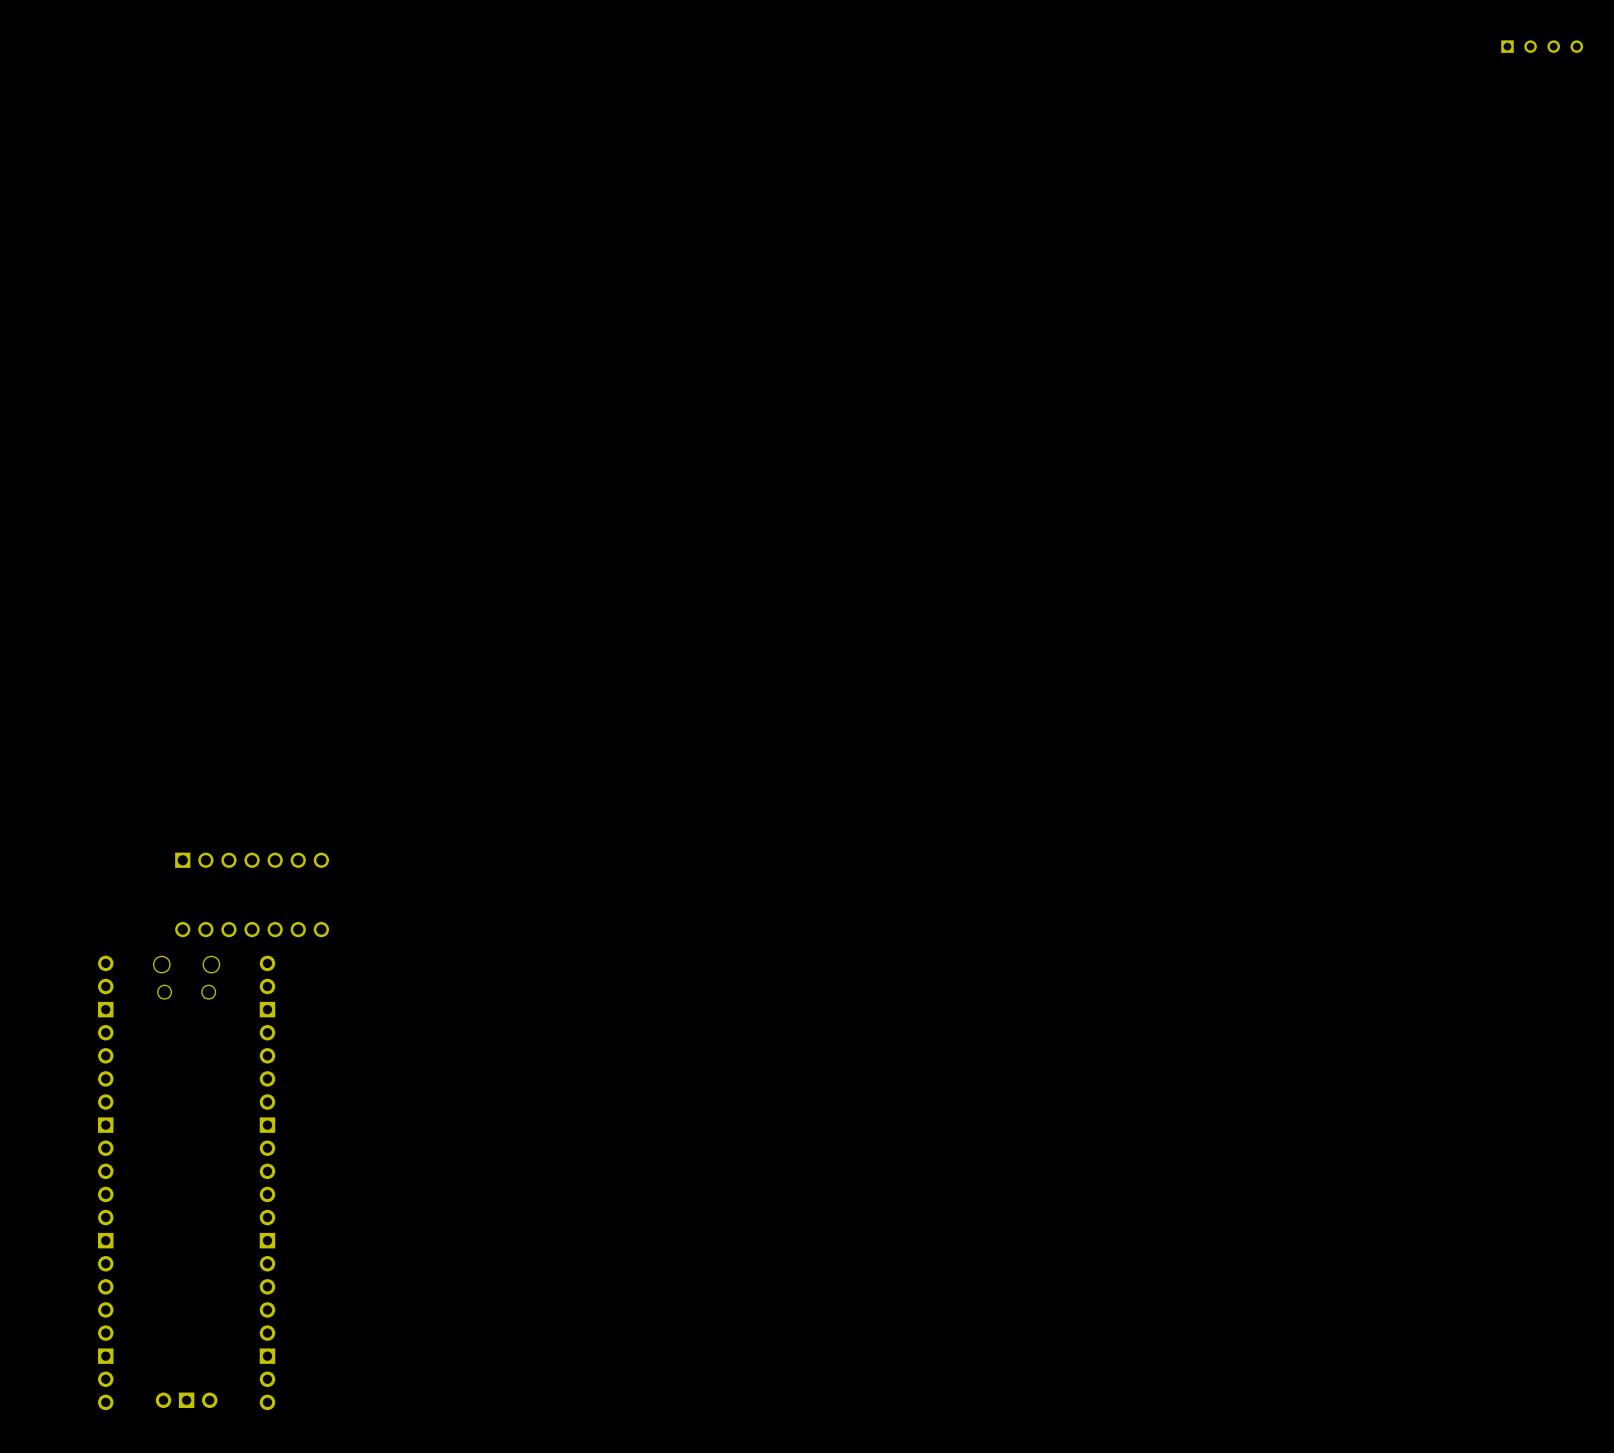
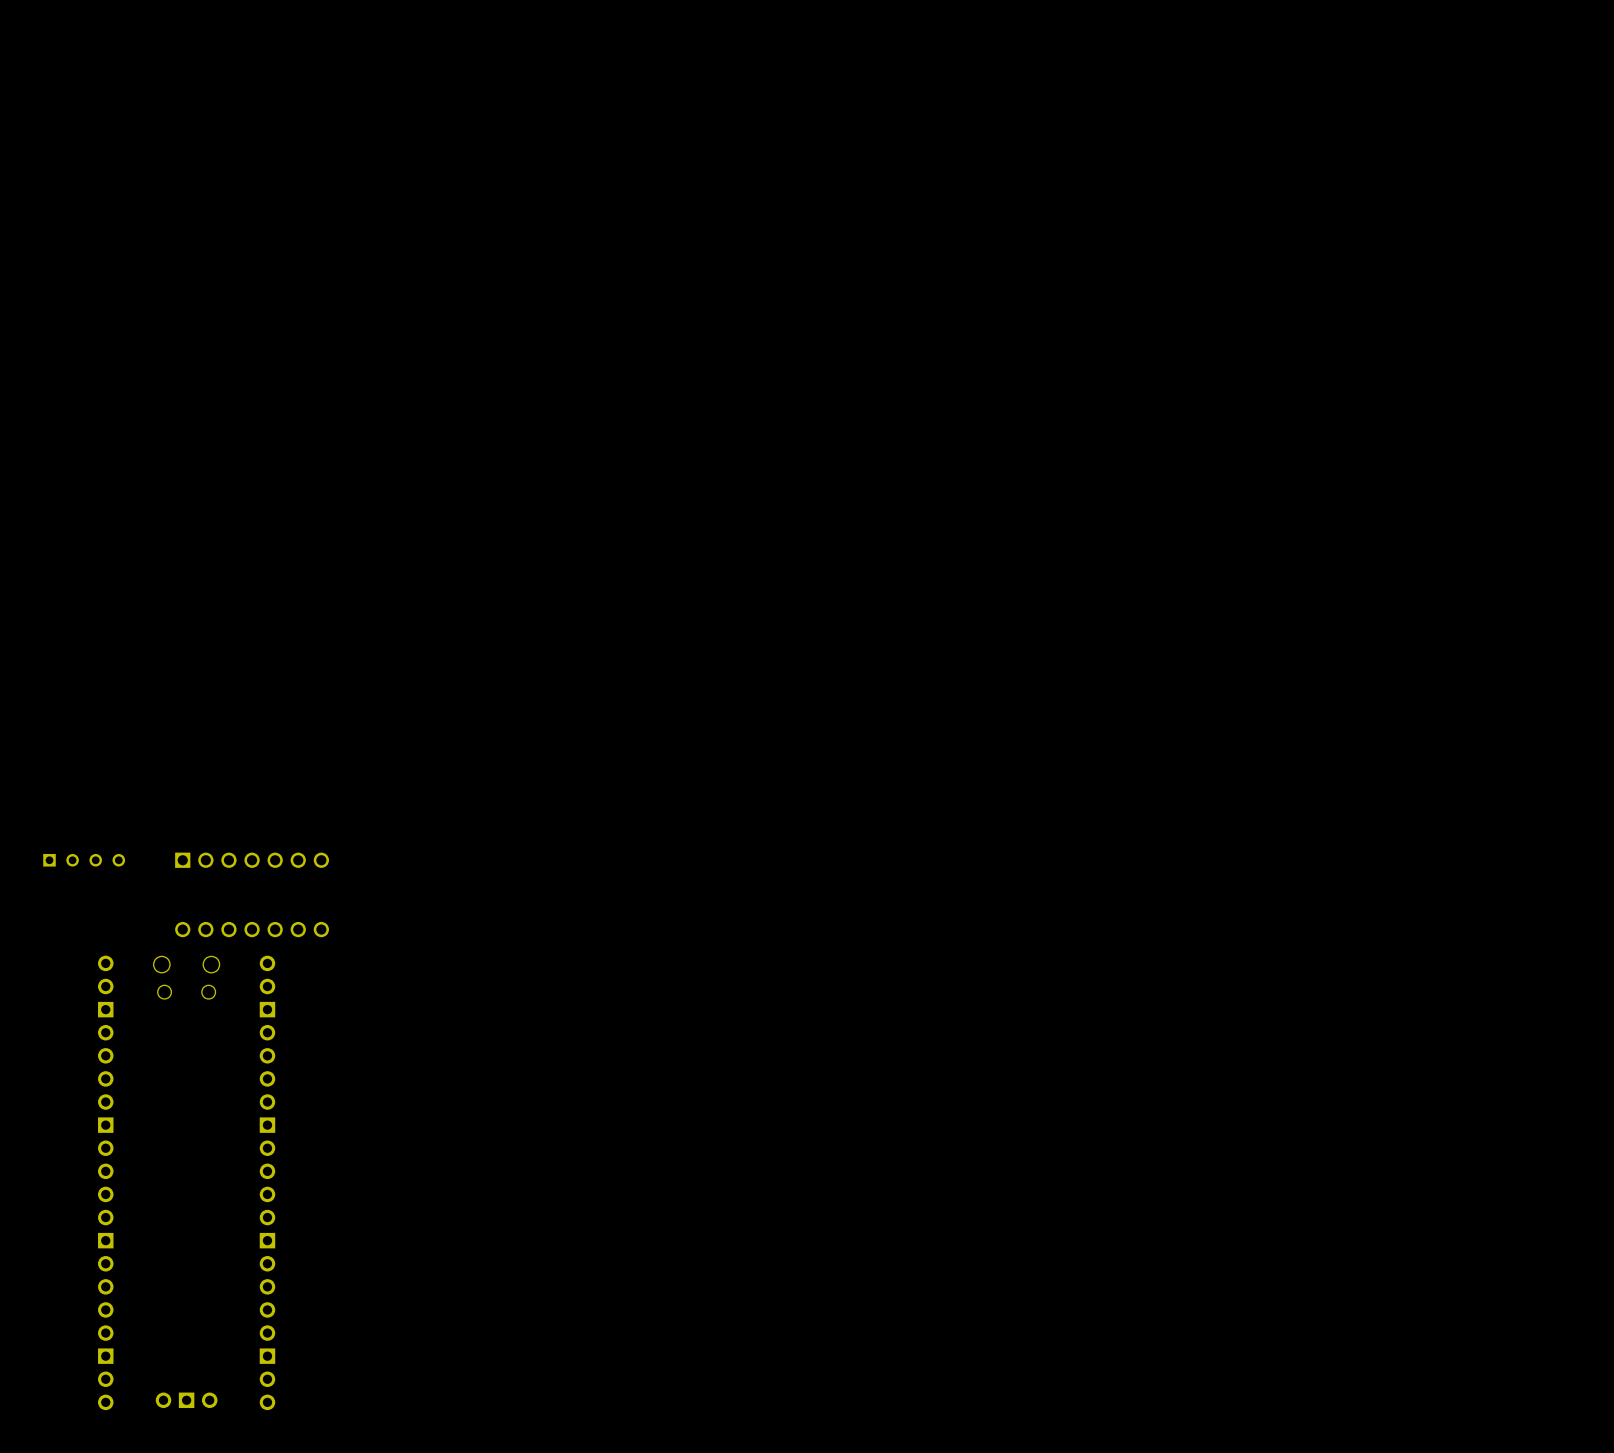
part: (1542, 46) -> none
part: none -> (84, 860)

